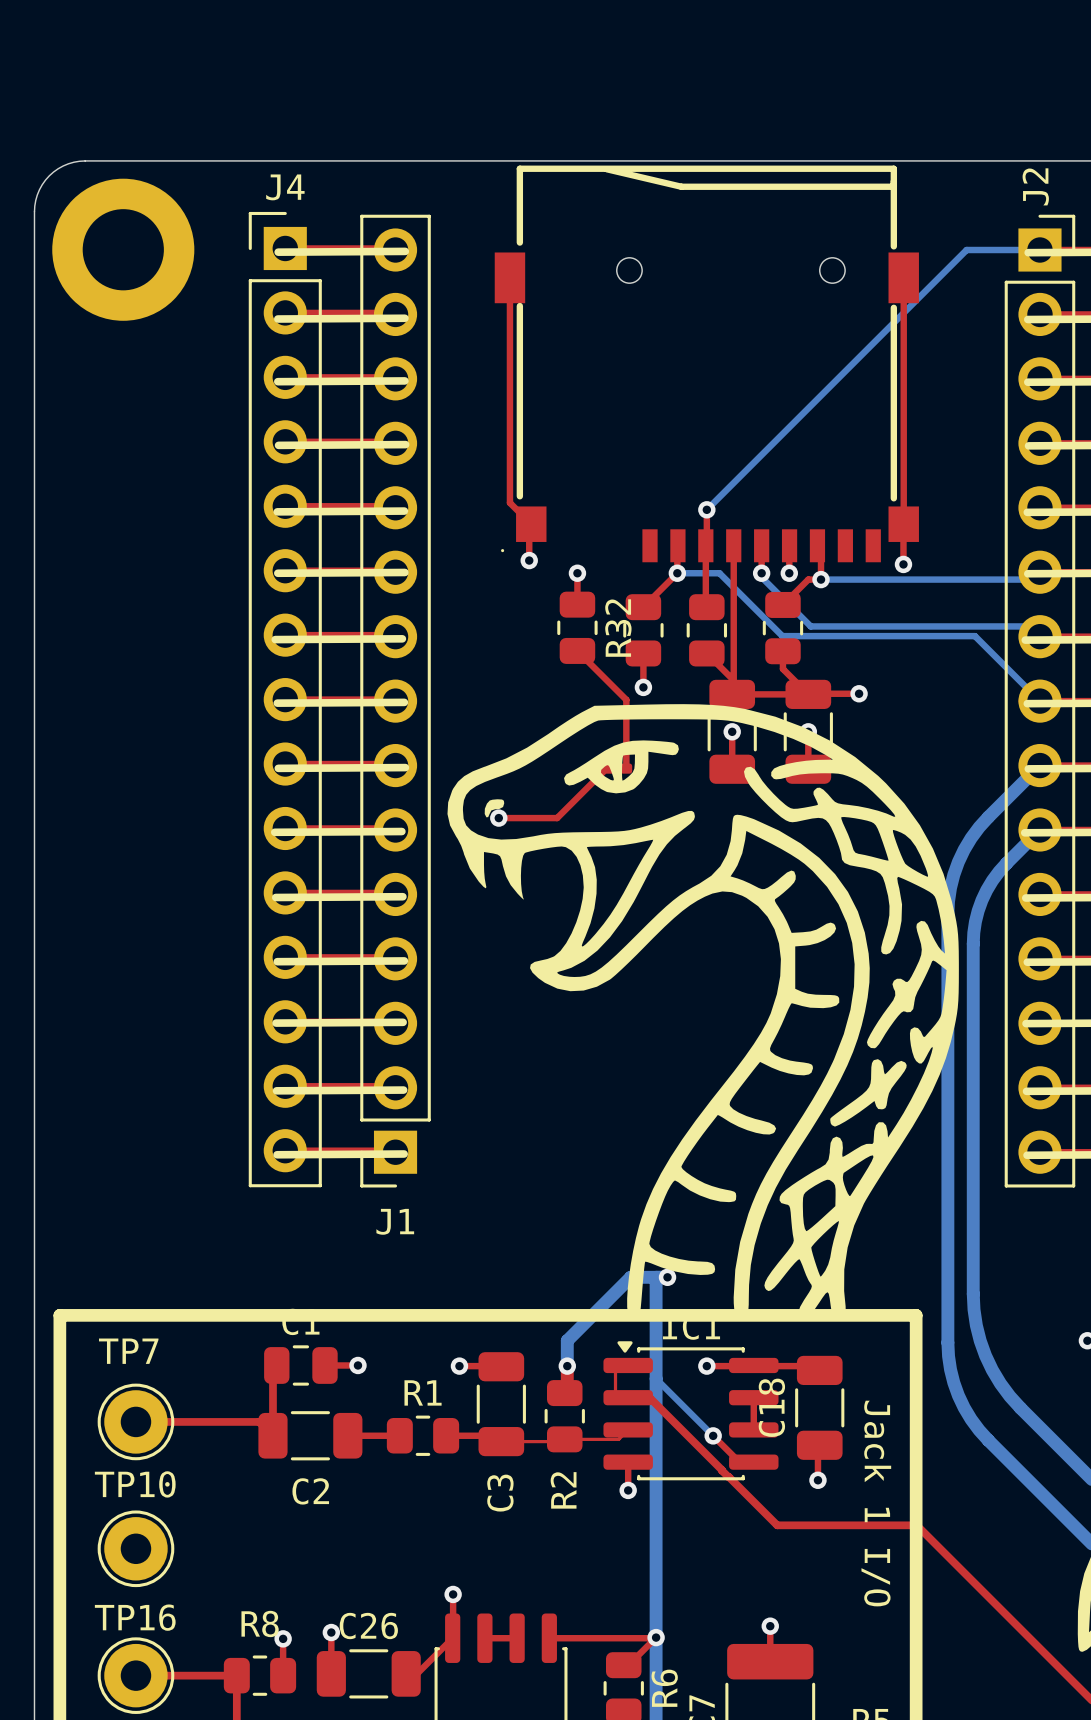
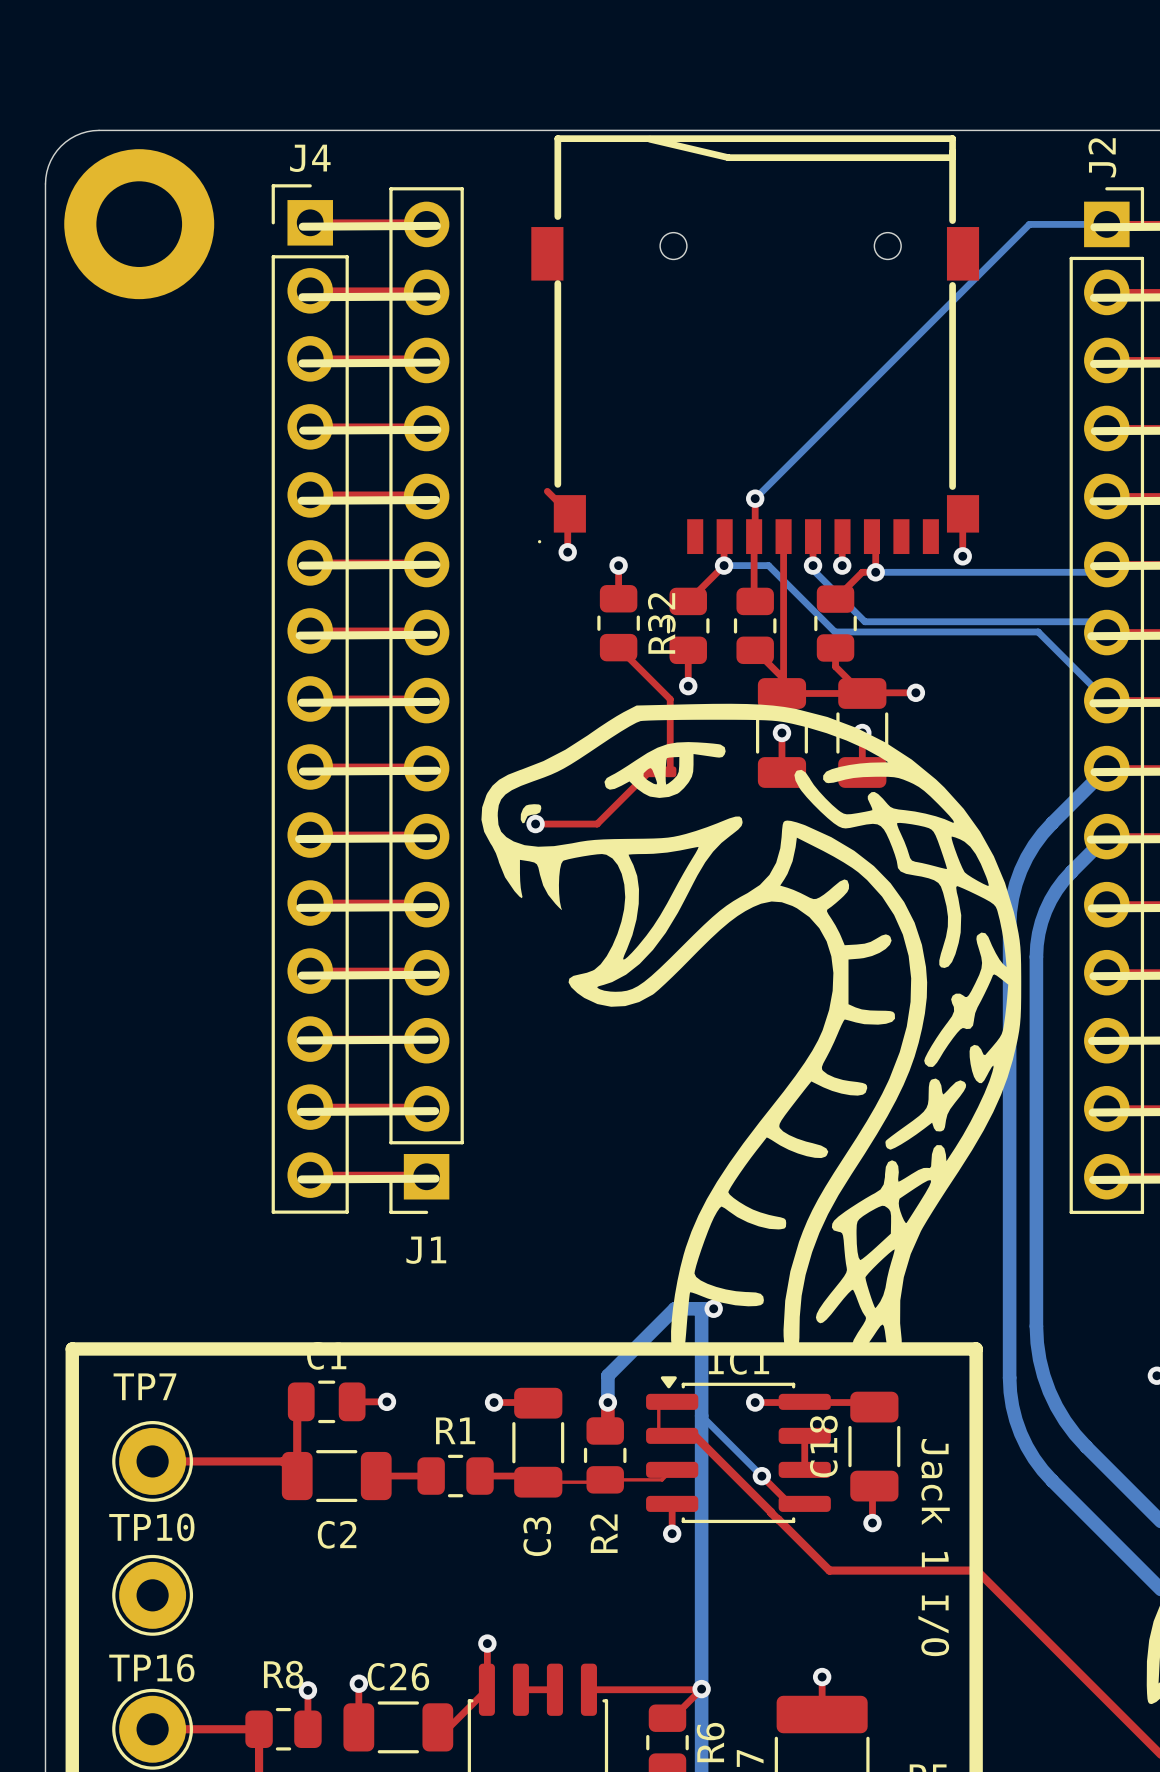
top track: (509, 277) (509, 502) -> none
top track: (903, 277) (903, 524) -> none

